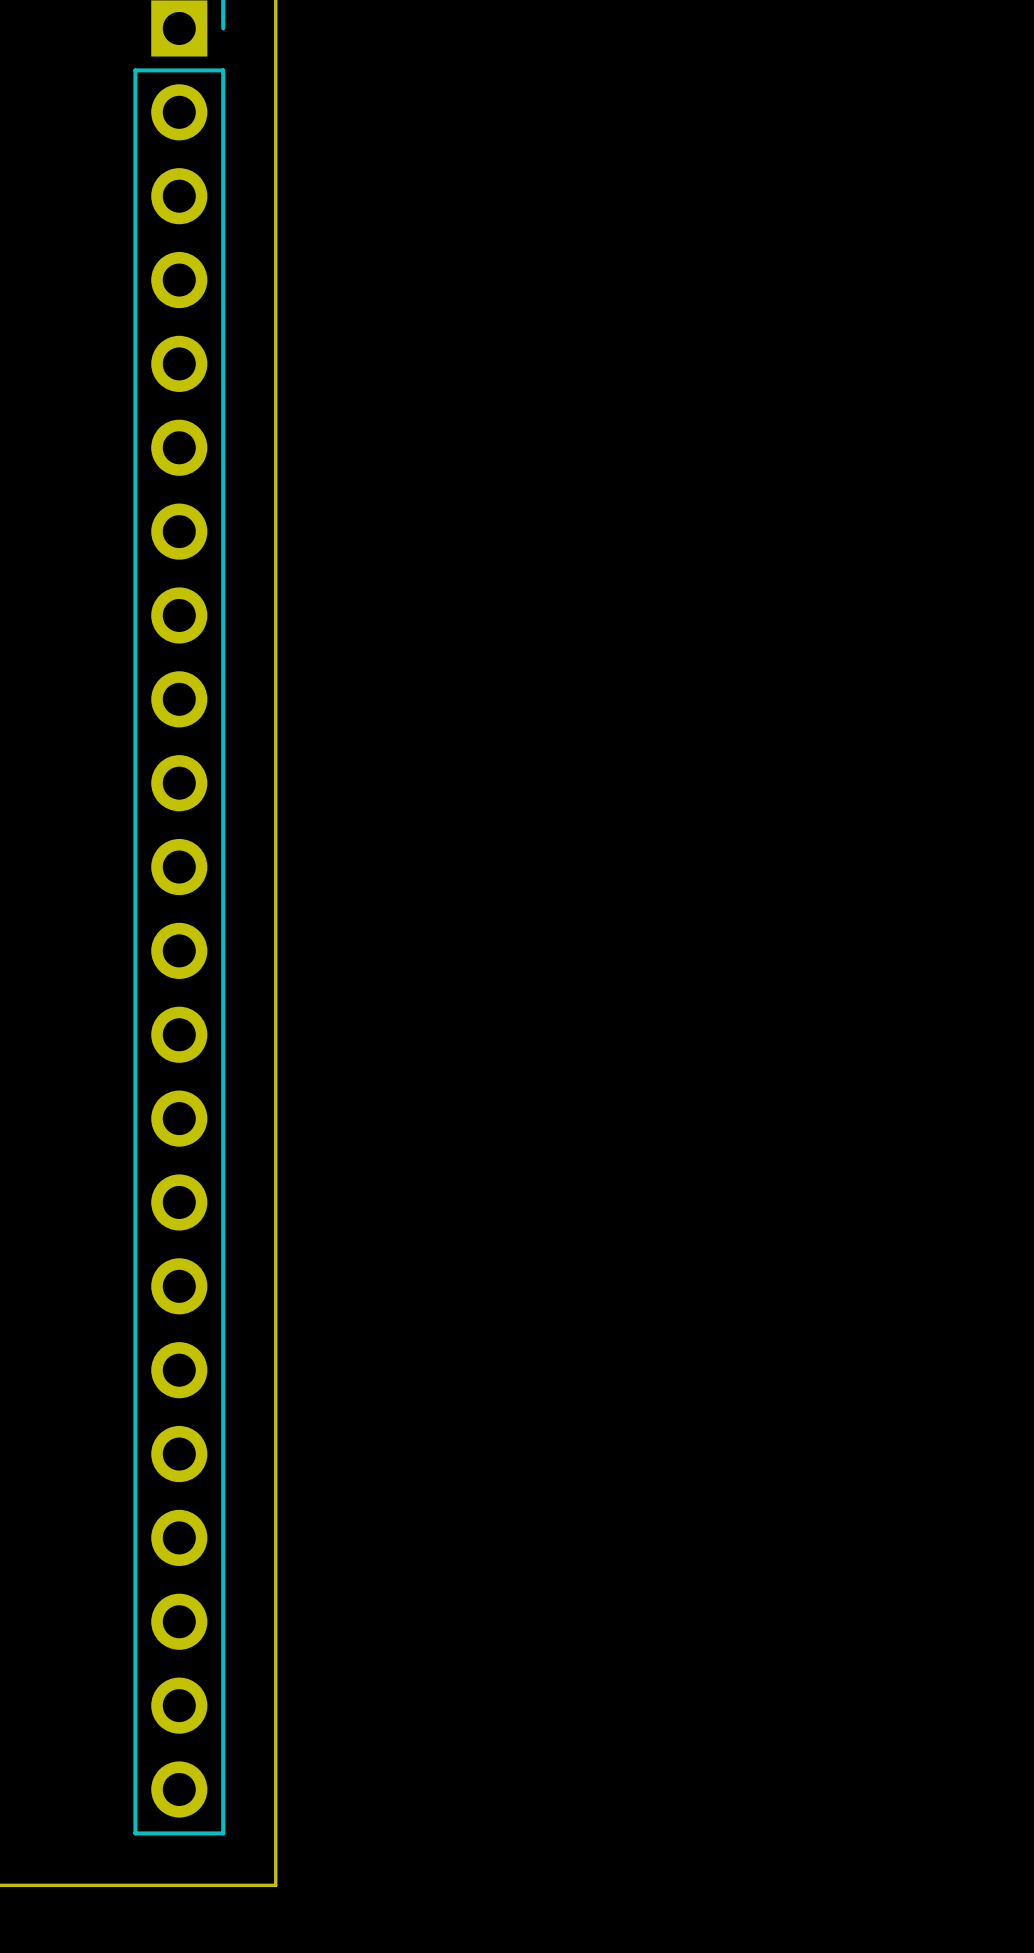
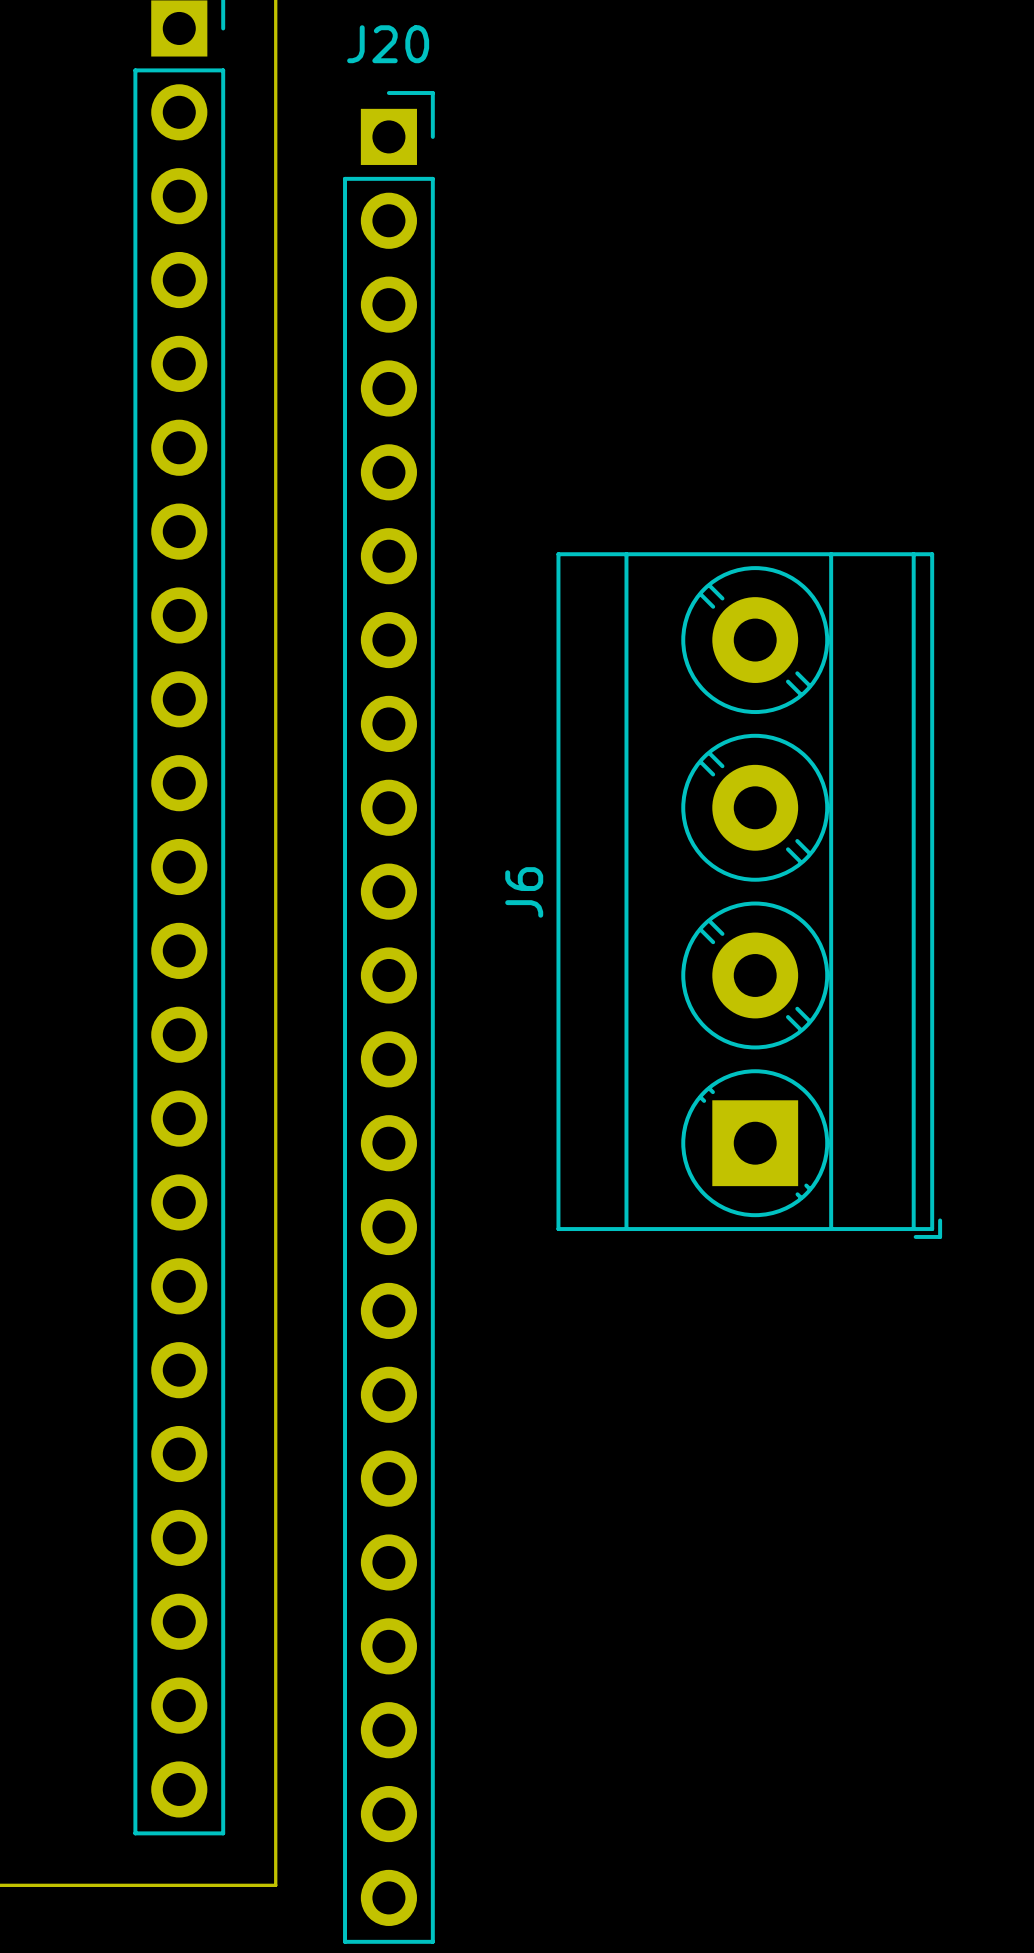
J6: none -> (749, 895)
J20: none -> (388, 1017)

